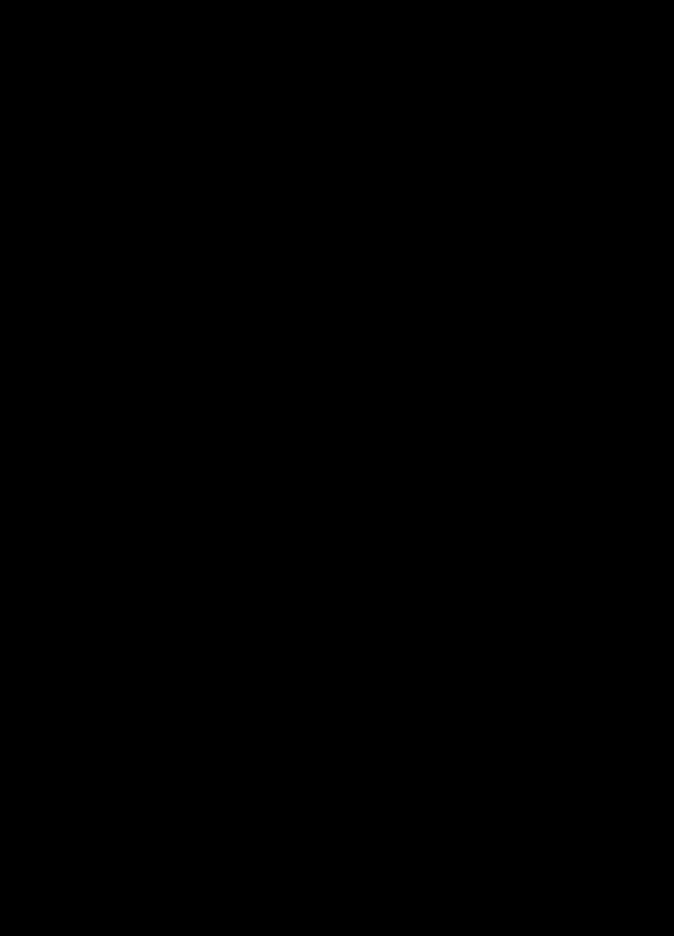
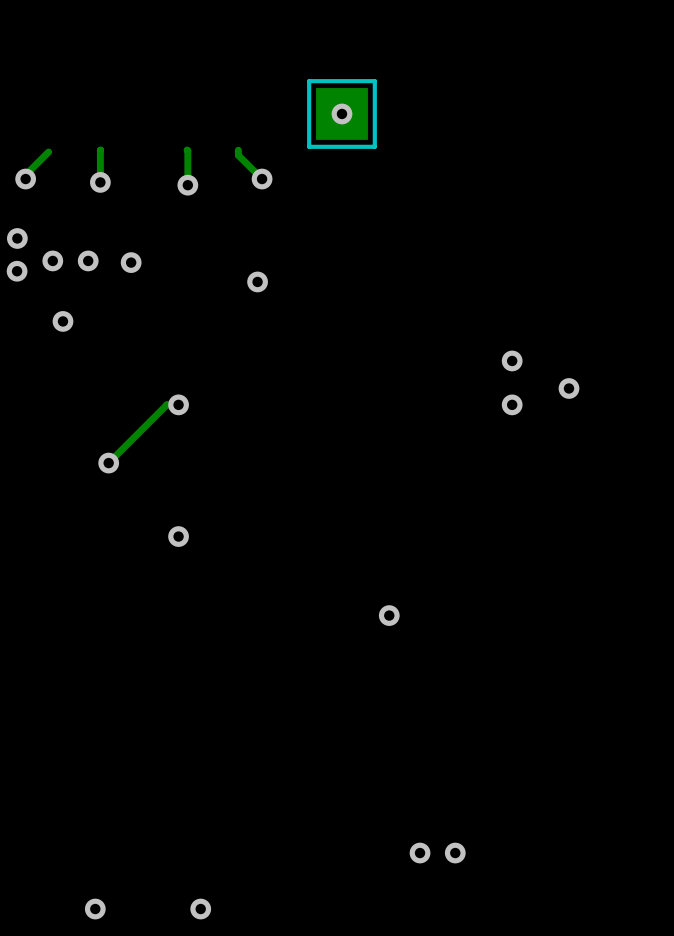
part: none -> (341, 113)
via: none -> (341, 113)
track: none -> (187, 149) (187, 185)
track: none -> (100, 150) (100, 182)
track: none -> (238, 150) (238, 155) (262, 179)
track: none -> (48, 151) (25, 174) (25, 179)
via: none -> (25, 179)
via: none -> (262, 179)
via: none -> (100, 182)
via: none -> (187, 185)
via: none -> (17, 238)
via: none -> (52, 260)
via: none -> (88, 260)
via: none -> (131, 262)
via: none -> (17, 271)
via: none -> (257, 281)
via: none -> (62, 321)
via: none -> (512, 360)
via: none -> (569, 388)
track: none -> (178, 404) (166, 404) (108, 463)
via: none -> (178, 404)
via: none -> (512, 404)
via: none -> (108, 463)
via: none -> (178, 536)
via: none -> (389, 615)
via: none -> (420, 853)
via: none -> (455, 853)
via: none -> (95, 909)
via: none -> (200, 909)

